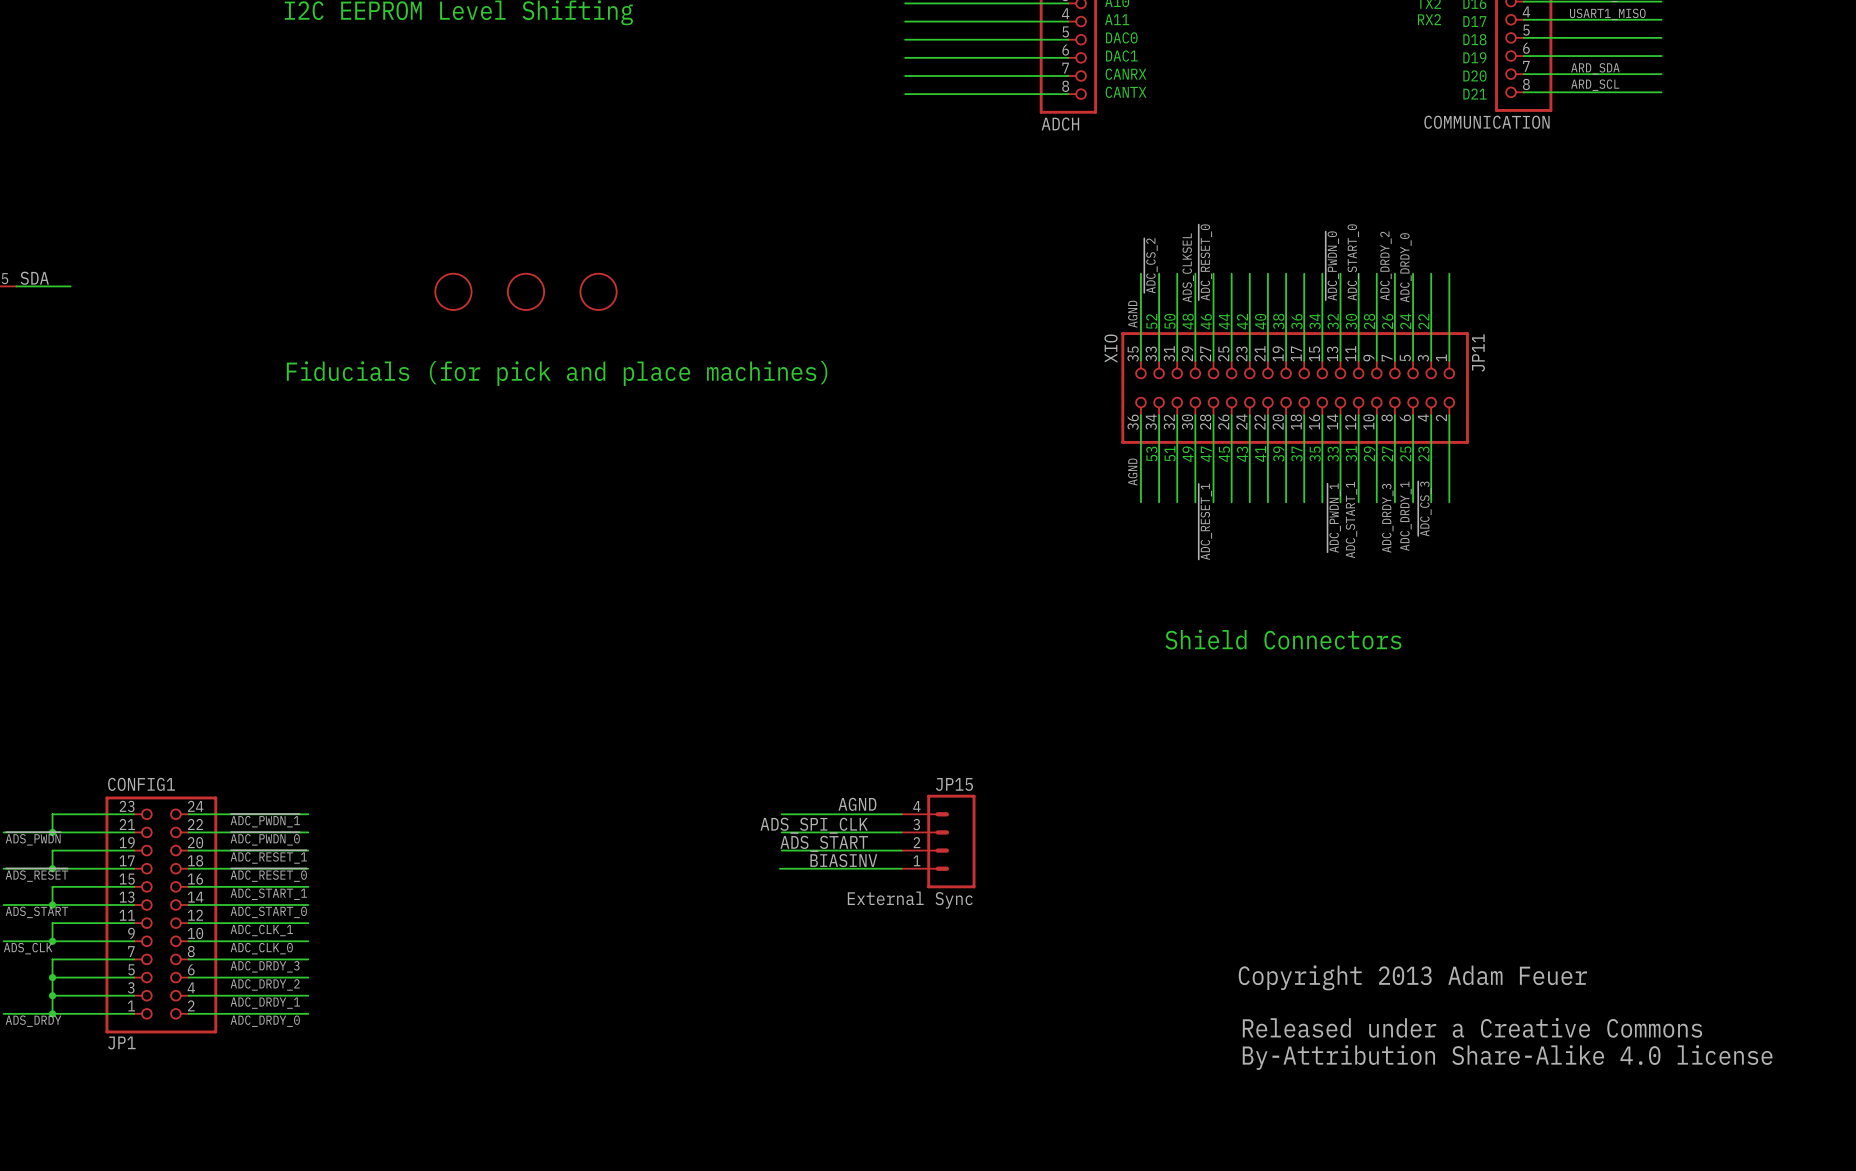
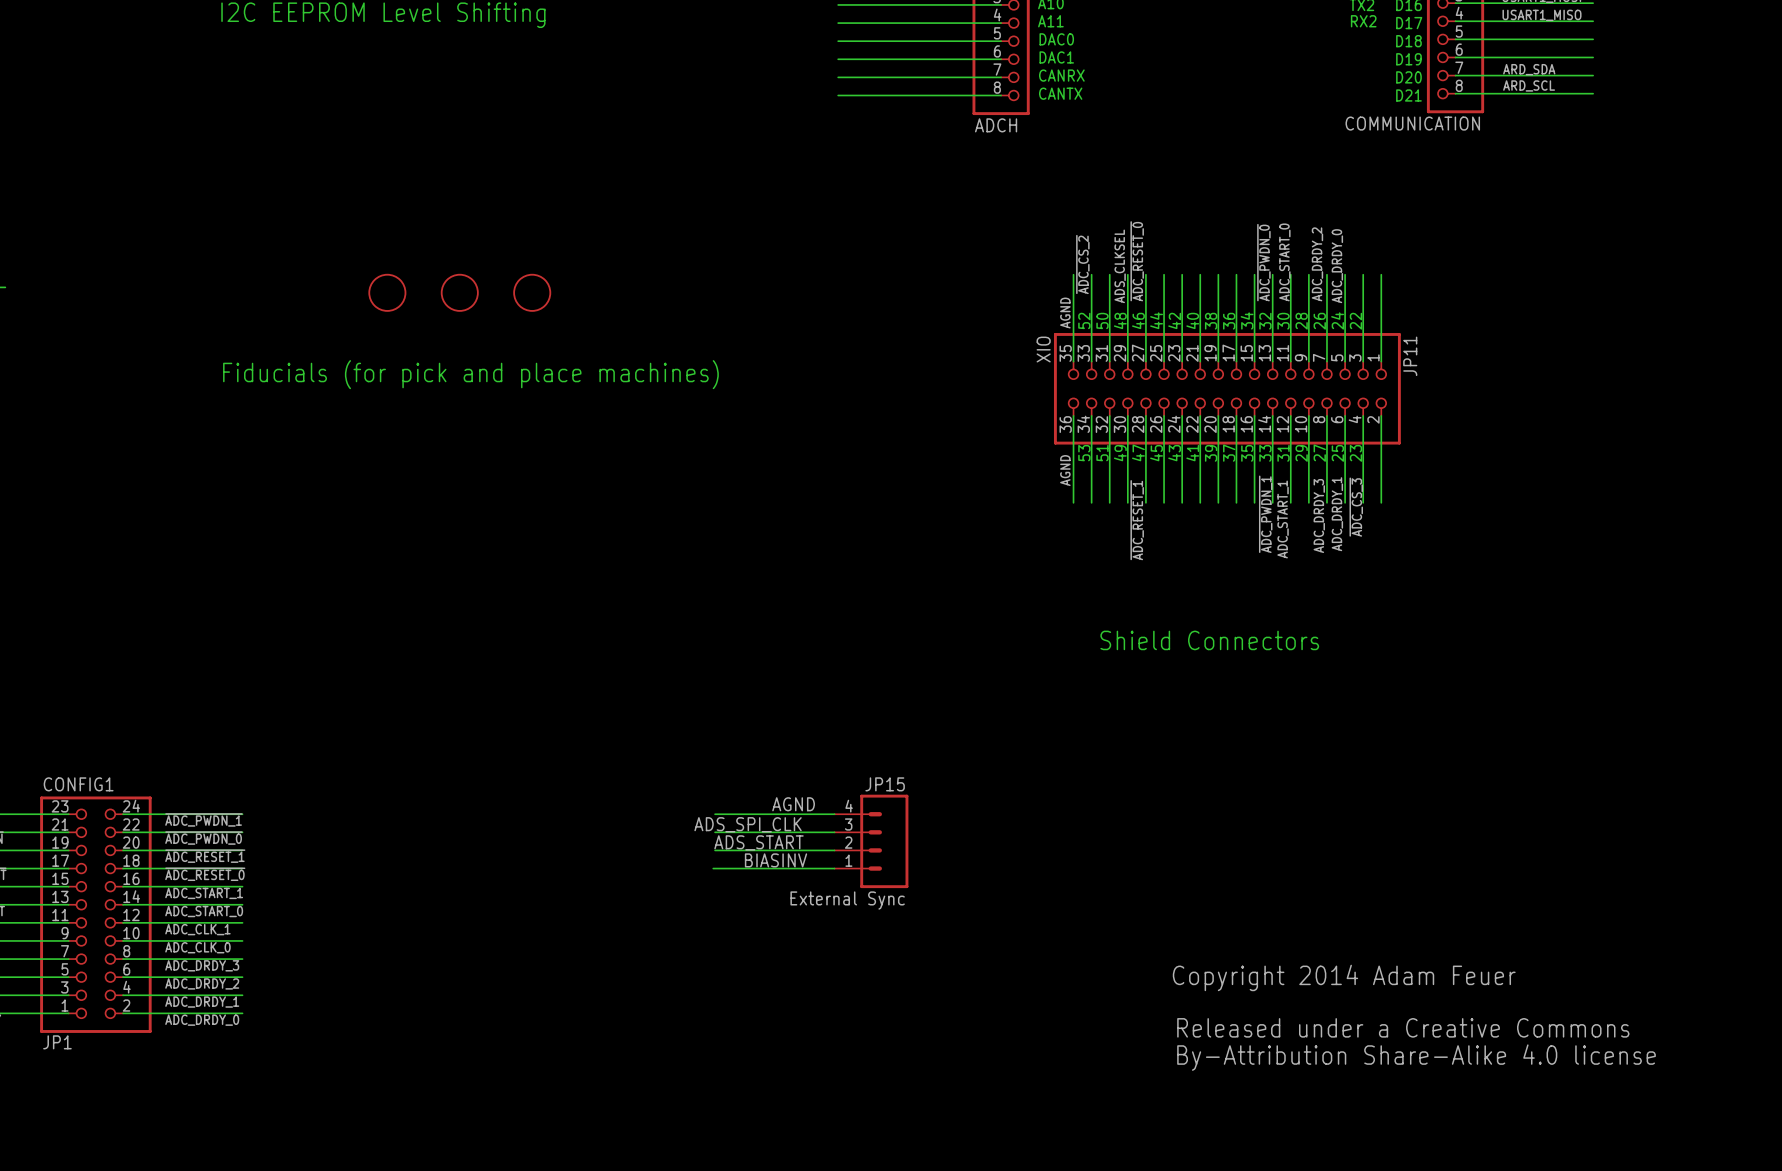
text: Copyright 2013 Adam Feuer (1412, 977) -> Copyright 2014 Adam Feuer (1344, 977)

